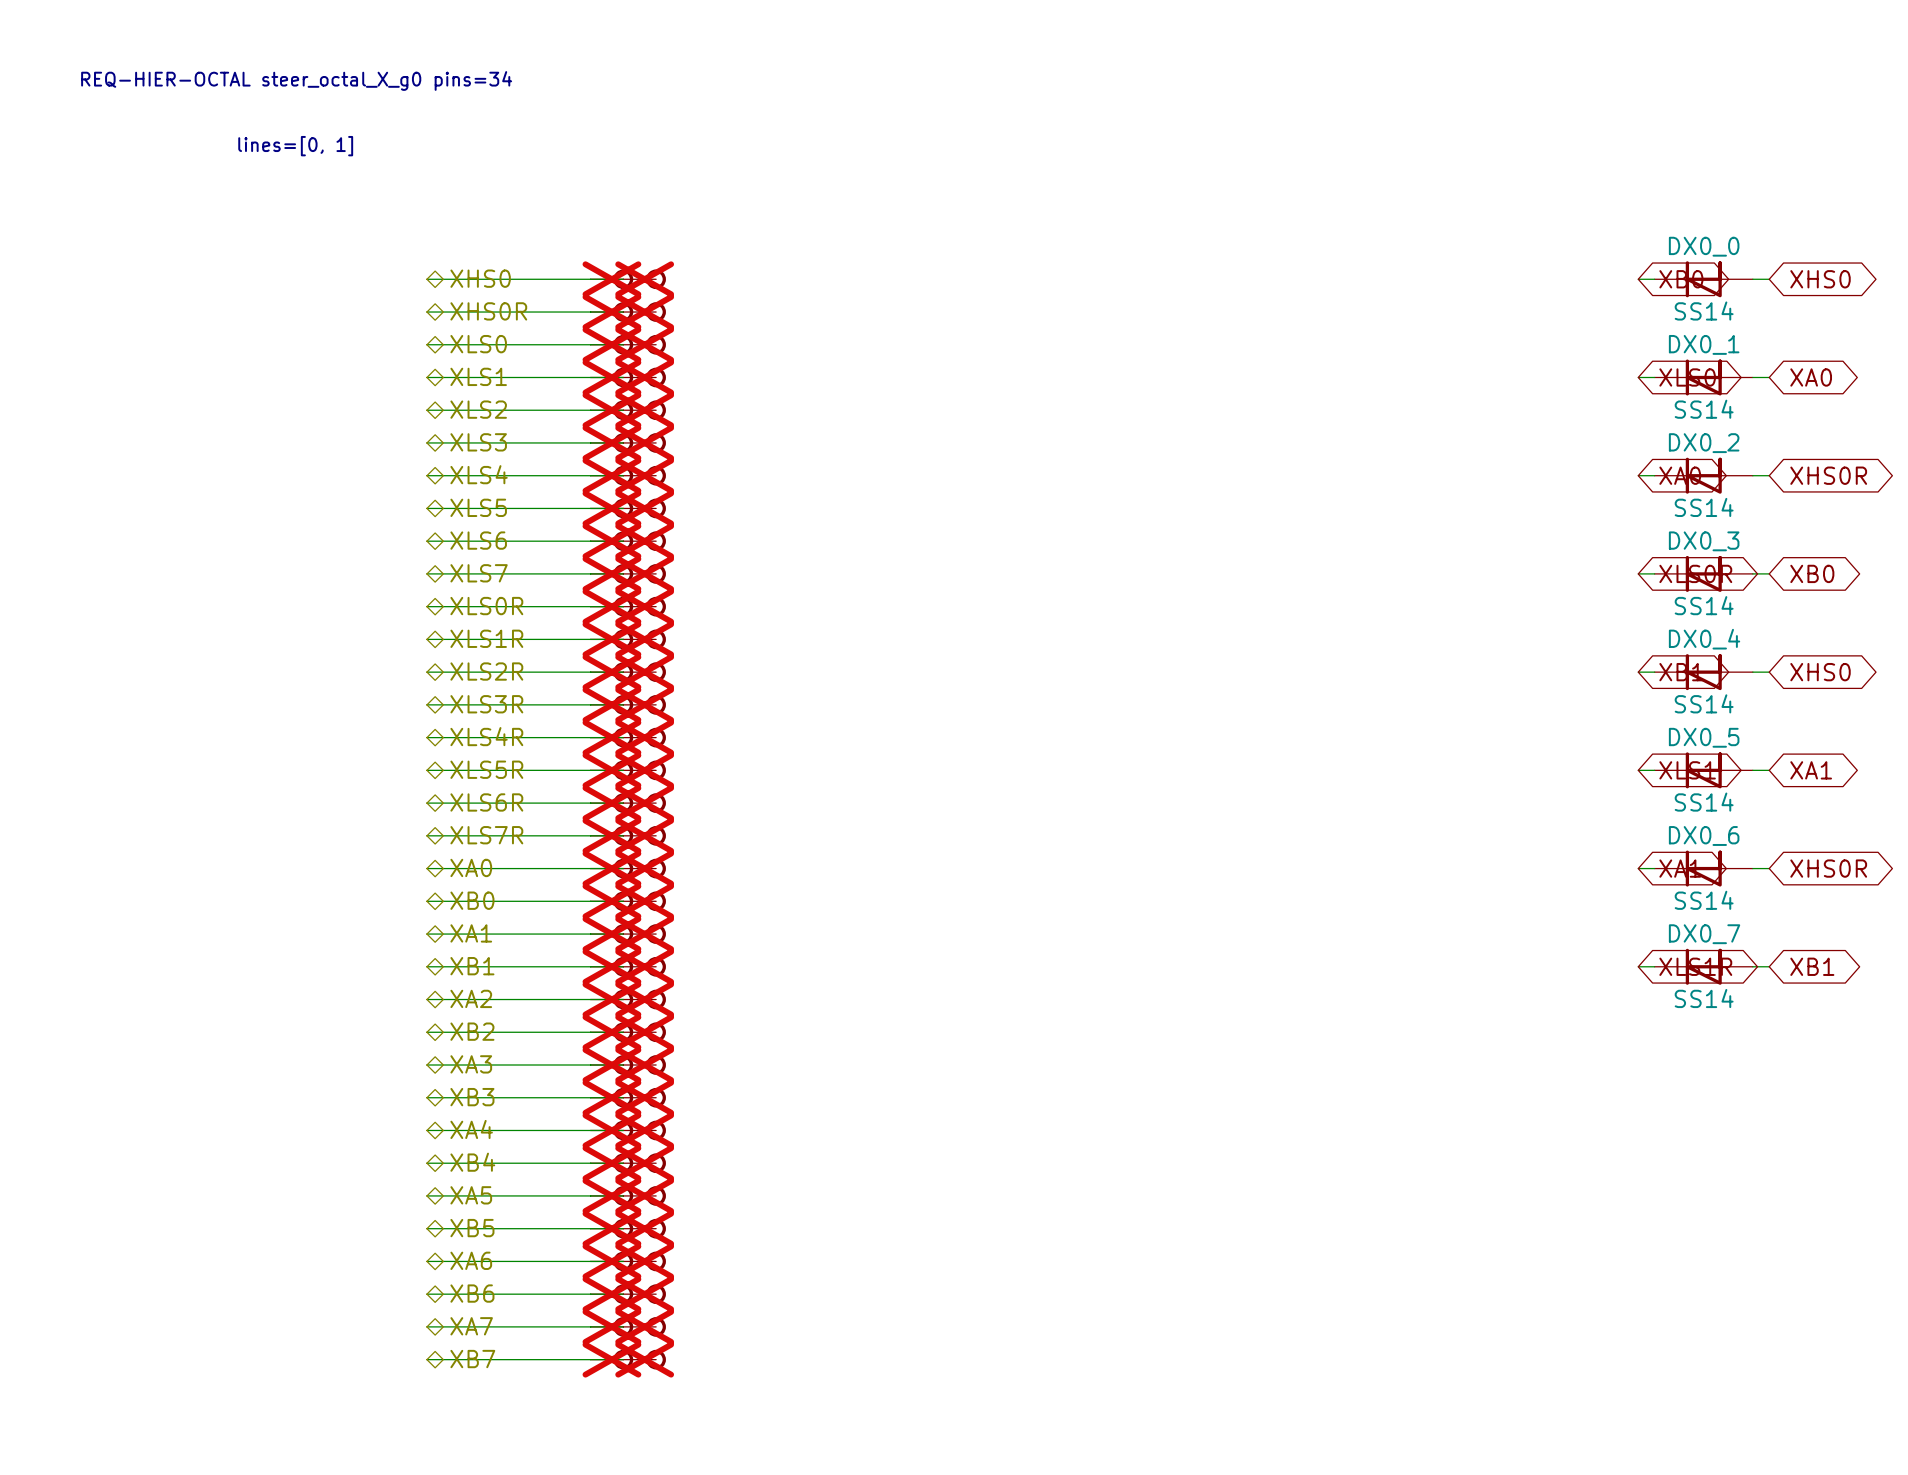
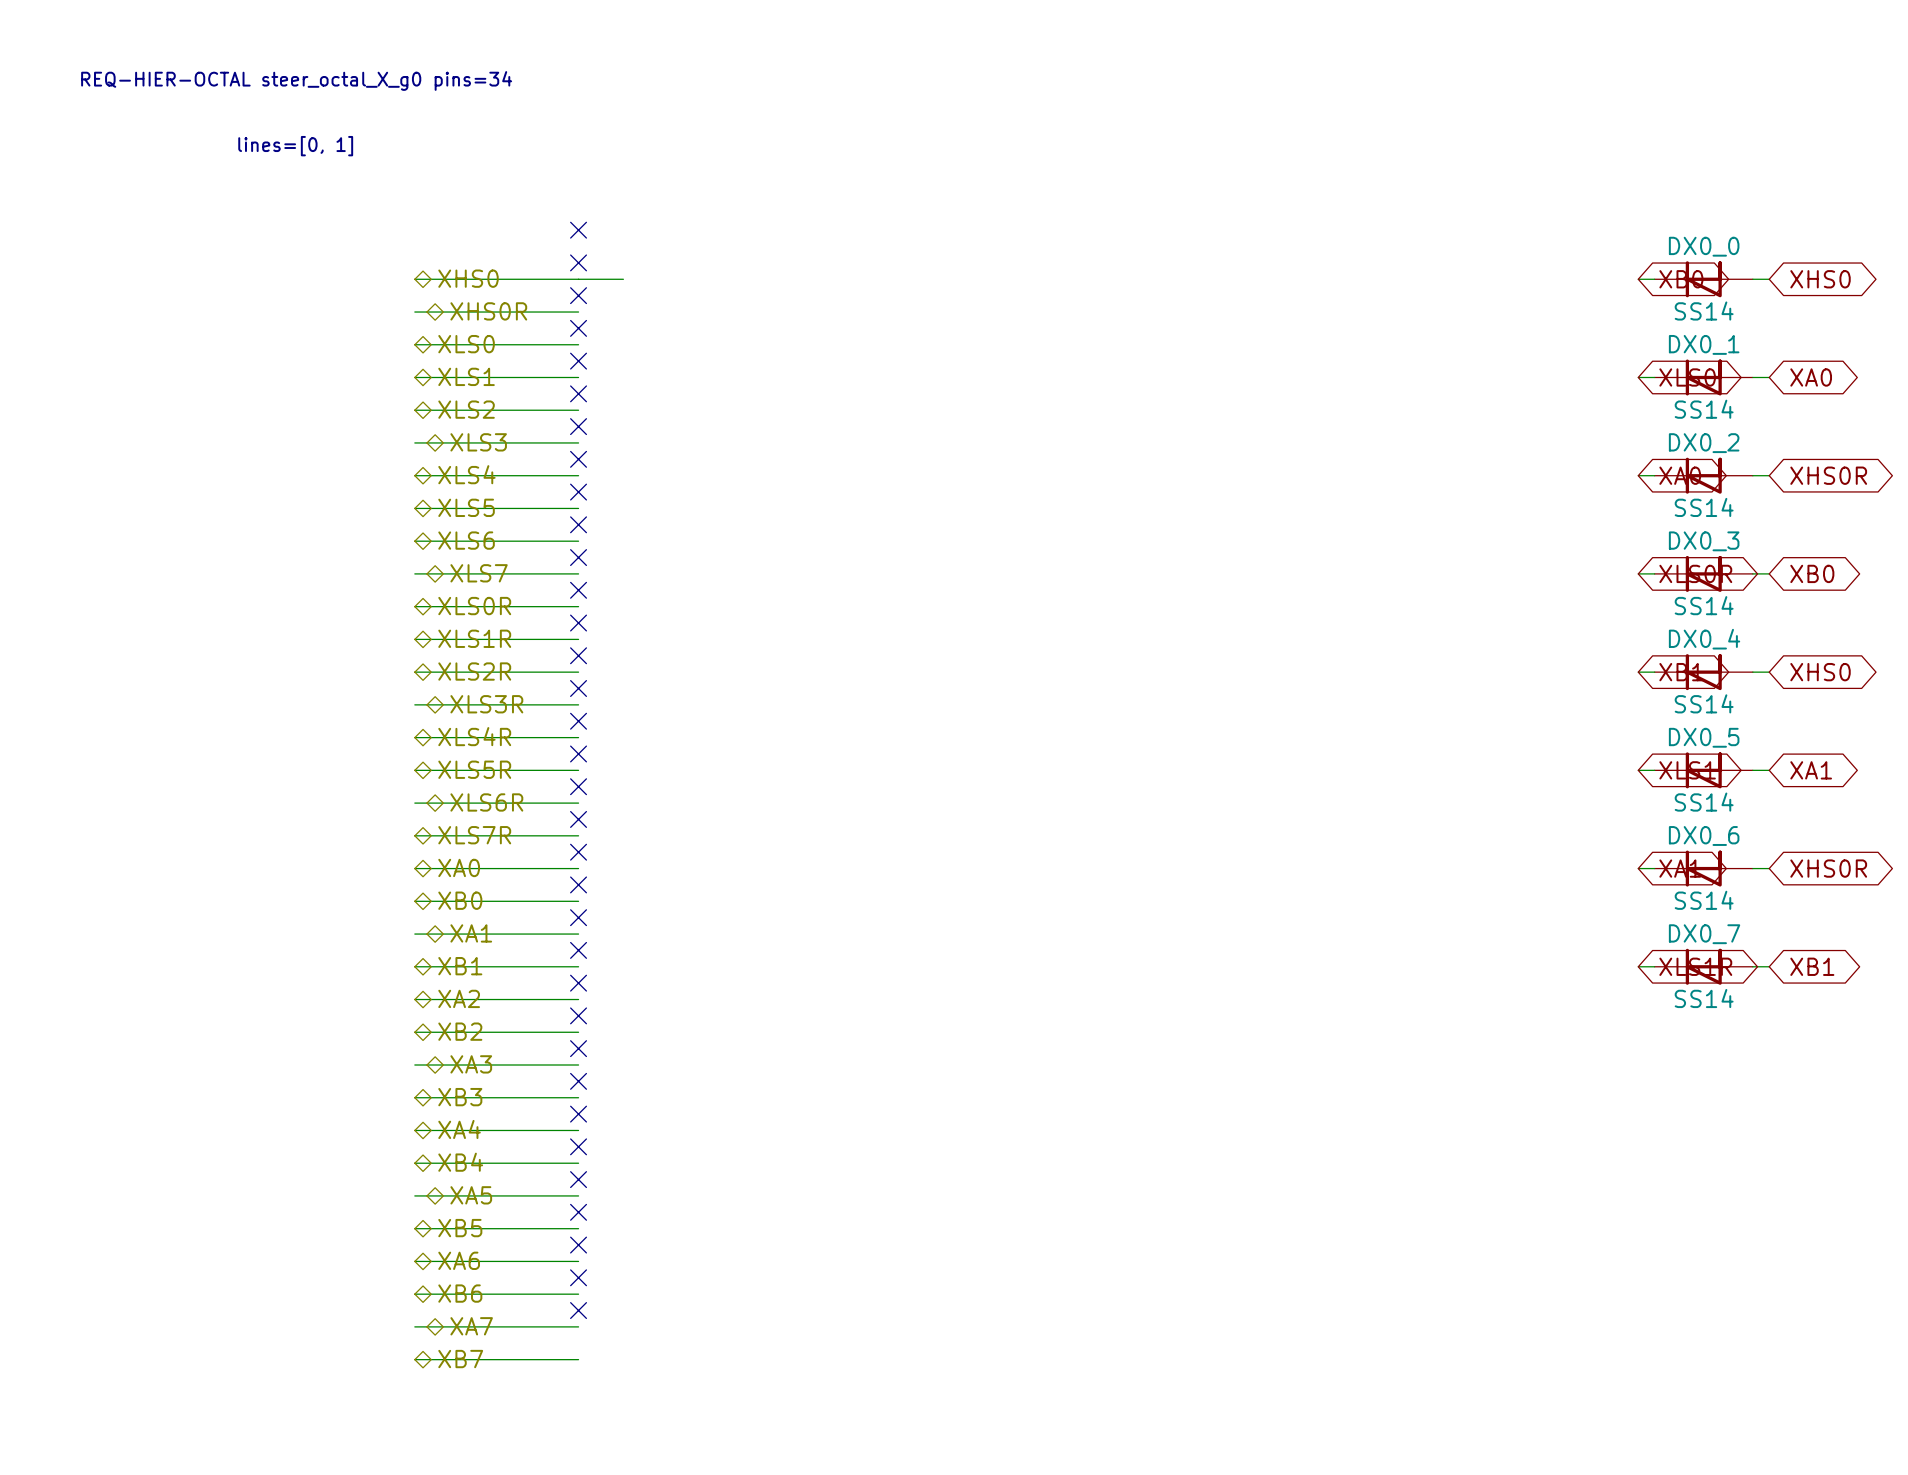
no-connect mark: none -> (578, 230)
no-connect mark: none -> (578, 262)
hierarchical label position: XHS0 (480, 278) -> XHS0 (468, 278)
wire: none -> (414, 279) (426, 279)
part: (611, 279) -> none
part: (644, 279) -> none
no-connect mark: none -> (578, 295)
wire: none -> (414, 312) (426, 312)
wire: (578, 312) (623, 312) -> none
part: (611, 312) -> none
part: (644, 312) -> none
no-connect mark: none -> (578, 328)
wire: none -> (414, 344) (426, 344)
hierarchical label position: XLS0 (478, 344) -> XLS0 (466, 344)
wire: (578, 344) (623, 344) -> none
part: (611, 344) -> none
part: (644, 344) -> none
no-connect mark: none -> (578, 361)
hierarchical label position: XLS1 (478, 376) -> XLS1 (466, 376)
wire: none -> (414, 377) (426, 377)
wire: (578, 377) (623, 377) -> none
part: (611, 377) -> none
part: (644, 377) -> none
no-connect mark: none -> (578, 393)
hierarchical label position: XLS2 (478, 409) -> XLS2 (466, 409)
wire: none -> (414, 410) (426, 410)
wire: (578, 410) (623, 410) -> none
part: (611, 410) -> none
part: (644, 410) -> none
no-connect mark: none -> (578, 426)
wire: none -> (414, 442) (426, 442)
wire: (578, 442) (623, 442) -> none
part: (611, 442) -> none
part: (644, 442) -> none
no-connect mark: none -> (578, 459)
hierarchical label position: XLS4 (479, 474) -> XLS4 (466, 474)
wire: none -> (414, 475) (426, 475)
wire: (578, 475) (623, 475) -> none
part: (611, 475) -> none
part: (644, 475) -> none
no-connect mark: none -> (578, 492)
hierarchical label position: XLS5 (478, 507) -> XLS5 (466, 507)
wire: none -> (414, 508) (426, 508)
wire: (578, 508) (623, 508) -> none
part: (611, 508) -> none
part: (644, 508) -> none
no-connect mark: none -> (578, 524)
hierarchical label position: XLS6 (478, 540) -> XLS6 (466, 540)
wire: none -> (414, 541) (426, 541)
wire: (578, 541) (623, 541) -> none
part: (611, 541) -> none
part: (644, 541) -> none
no-connect mark: none -> (578, 557)
wire: none -> (414, 573) (426, 573)
wire: (578, 573) (623, 573) -> none
part: (611, 573) -> none
part: (644, 573) -> none
no-connect mark: none -> (578, 590)
wire: none -> (414, 606) (426, 606)
hierarchical label position: XLS0R (486, 606) -> XLS0R (474, 606)
wire: (578, 606) (623, 606) -> none
part: (611, 606) -> none
part: (644, 606) -> none
no-connect mark: none -> (578, 623)
hierarchical label position: XLS1R (486, 638) -> XLS1R (474, 638)
wire: none -> (414, 639) (426, 639)
wire: (578, 639) (623, 639) -> none
part: (611, 639) -> none
part: (644, 639) -> none
no-connect mark: none -> (578, 655)
hierarchical label position: XLS2R (486, 671) -> XLS2R (474, 671)
wire: none -> (414, 672) (426, 672)
wire: (578, 672) (623, 672) -> none
part: (611, 672) -> none
part: (644, 672) -> none
no-connect mark: none -> (578, 688)
wire: none -> (414, 704) (426, 704)
wire: (578, 704) (623, 704) -> none
part: (611, 704) -> none
part: (644, 704) -> none
no-connect mark: none -> (578, 721)
hierarchical label position: XLS4R (486, 736) -> XLS4R (474, 736)
wire: none -> (414, 737) (426, 737)
wire: (578, 737) (623, 737) -> none
part: (611, 737) -> none
part: (644, 737) -> none
no-connect mark: none -> (578, 753)
hierarchical label position: XLS5R (486, 769) -> XLS5R (474, 769)
wire: none -> (414, 770) (426, 770)
wire: (578, 770) (623, 770) -> none
part: (611, 770) -> none
part: (644, 770) -> none
no-connect mark: none -> (578, 786)
wire: none -> (414, 803) (426, 803)
wire: (578, 803) (623, 803) -> none
part: (611, 803) -> none
part: (644, 803) -> none
no-connect mark: none -> (578, 819)
wire: none -> (414, 835) (426, 835)
hierarchical label position: XLS7R (486, 835) -> XLS7R (474, 835)
wire: (578, 835) (623, 835) -> none
part: (611, 835) -> none
part: (644, 835) -> none
no-connect mark: none -> (578, 852)
hierarchical label position: XA0 (471, 867) -> XA0 (459, 867)
wire: none -> (414, 868) (426, 868)
wire: (578, 868) (623, 868) -> none
part: (611, 868) -> none
part: (644, 868) -> none
no-connect mark: none -> (578, 884)
hierarchical label position: XB0 (472, 900) -> XB0 (460, 900)
wire: none -> (414, 901) (426, 901)
wire: (578, 901) (623, 901) -> none
part: (611, 901) -> none
part: (644, 901) -> none
no-connect mark: none -> (578, 917)
wire: none -> (414, 934) (426, 934)
wire: (578, 934) (623, 934) -> none
part: (611, 934) -> none
part: (644, 934) -> none
no-connect mark: none -> (578, 950)
wire: none -> (414, 966) (426, 966)
hierarchical label position: XB1 (472, 966) -> XB1 (460, 966)
wire: (578, 966) (623, 966) -> none
part: (611, 966) -> none
part: (644, 966) -> none
no-connect mark: none -> (578, 983)
hierarchical label position: XA2 (471, 998) -> XA2 (459, 998)
wire: none -> (414, 999) (426, 999)
wire: (578, 999) (623, 999) -> none
part: (611, 999) -> none
part: (644, 999) -> none
no-connect mark: none -> (578, 1015)
hierarchical label position: XB2 (472, 1031) -> XB2 (460, 1031)
wire: none -> (414, 1032) (426, 1032)
wire: (578, 1032) (623, 1032) -> none
part: (611, 1032) -> none
part: (644, 1032) -> none
no-connect mark: none -> (578, 1048)
wire: none -> (414, 1065) (426, 1065)
wire: (578, 1065) (623, 1065) -> none
part: (611, 1065) -> none
part: (644, 1065) -> none
no-connect mark: none -> (578, 1081)
wire: none -> (414, 1097) (426, 1097)
hierarchical label position: XB3 (472, 1097) -> XB3 (460, 1097)
wire: (578, 1097) (623, 1097) -> none
part: (611, 1097) -> none
part: (644, 1097) -> none
no-connect mark: none -> (578, 1114)
hierarchical label position: XA4 (471, 1129) -> XA4 (459, 1129)
wire: none -> (414, 1130) (426, 1130)
wire: (578, 1130) (623, 1130) -> none
part: (611, 1130) -> none
part: (644, 1130) -> none
no-connect mark: none -> (578, 1146)
hierarchical label position: XB4 (472, 1162) -> XB4 (460, 1162)
wire: none -> (414, 1163) (426, 1163)
wire: (578, 1163) (623, 1163) -> none
part: (611, 1163) -> none
part: (644, 1163) -> none
no-connect mark: none -> (578, 1179)
wire: none -> (414, 1195) (426, 1195)
wire: (578, 1195) (623, 1195) -> none
part: (611, 1195) -> none
part: (644, 1195) -> none
no-connect mark: none -> (578, 1212)
wire: none -> (414, 1228) (426, 1228)
hierarchical label position: XB5 (472, 1228) -> XB5 (460, 1228)
wire: (578, 1228) (623, 1228) -> none
part: (611, 1228) -> none
part: (644, 1228) -> none
no-connect mark: none -> (578, 1245)
hierarchical label position: XA6 (471, 1260) -> XA6 (459, 1260)
wire: none -> (414, 1261) (426, 1261)
wire: (578, 1261) (623, 1261) -> none
part: (611, 1261) -> none
part: (644, 1261) -> none
no-connect mark: none -> (578, 1277)
hierarchical label position: XB6 (472, 1293) -> XB6 (460, 1293)
wire: none -> (414, 1294) (426, 1294)
wire: (578, 1294) (623, 1294) -> none
part: (611, 1294) -> none
part: (644, 1294) -> none
no-connect mark: none -> (578, 1310)
wire: none -> (414, 1326) (426, 1326)
wire: (578, 1326) (623, 1326) -> none
part: (611, 1326) -> none
part: (644, 1326) -> none
wire: none -> (414, 1359) (426, 1359)
hierarchical label position: XB7 (472, 1359) -> XB7 (460, 1359)
wire: (578, 1359) (623, 1359) -> none
part: (611, 1359) -> none
part: (644, 1359) -> none

